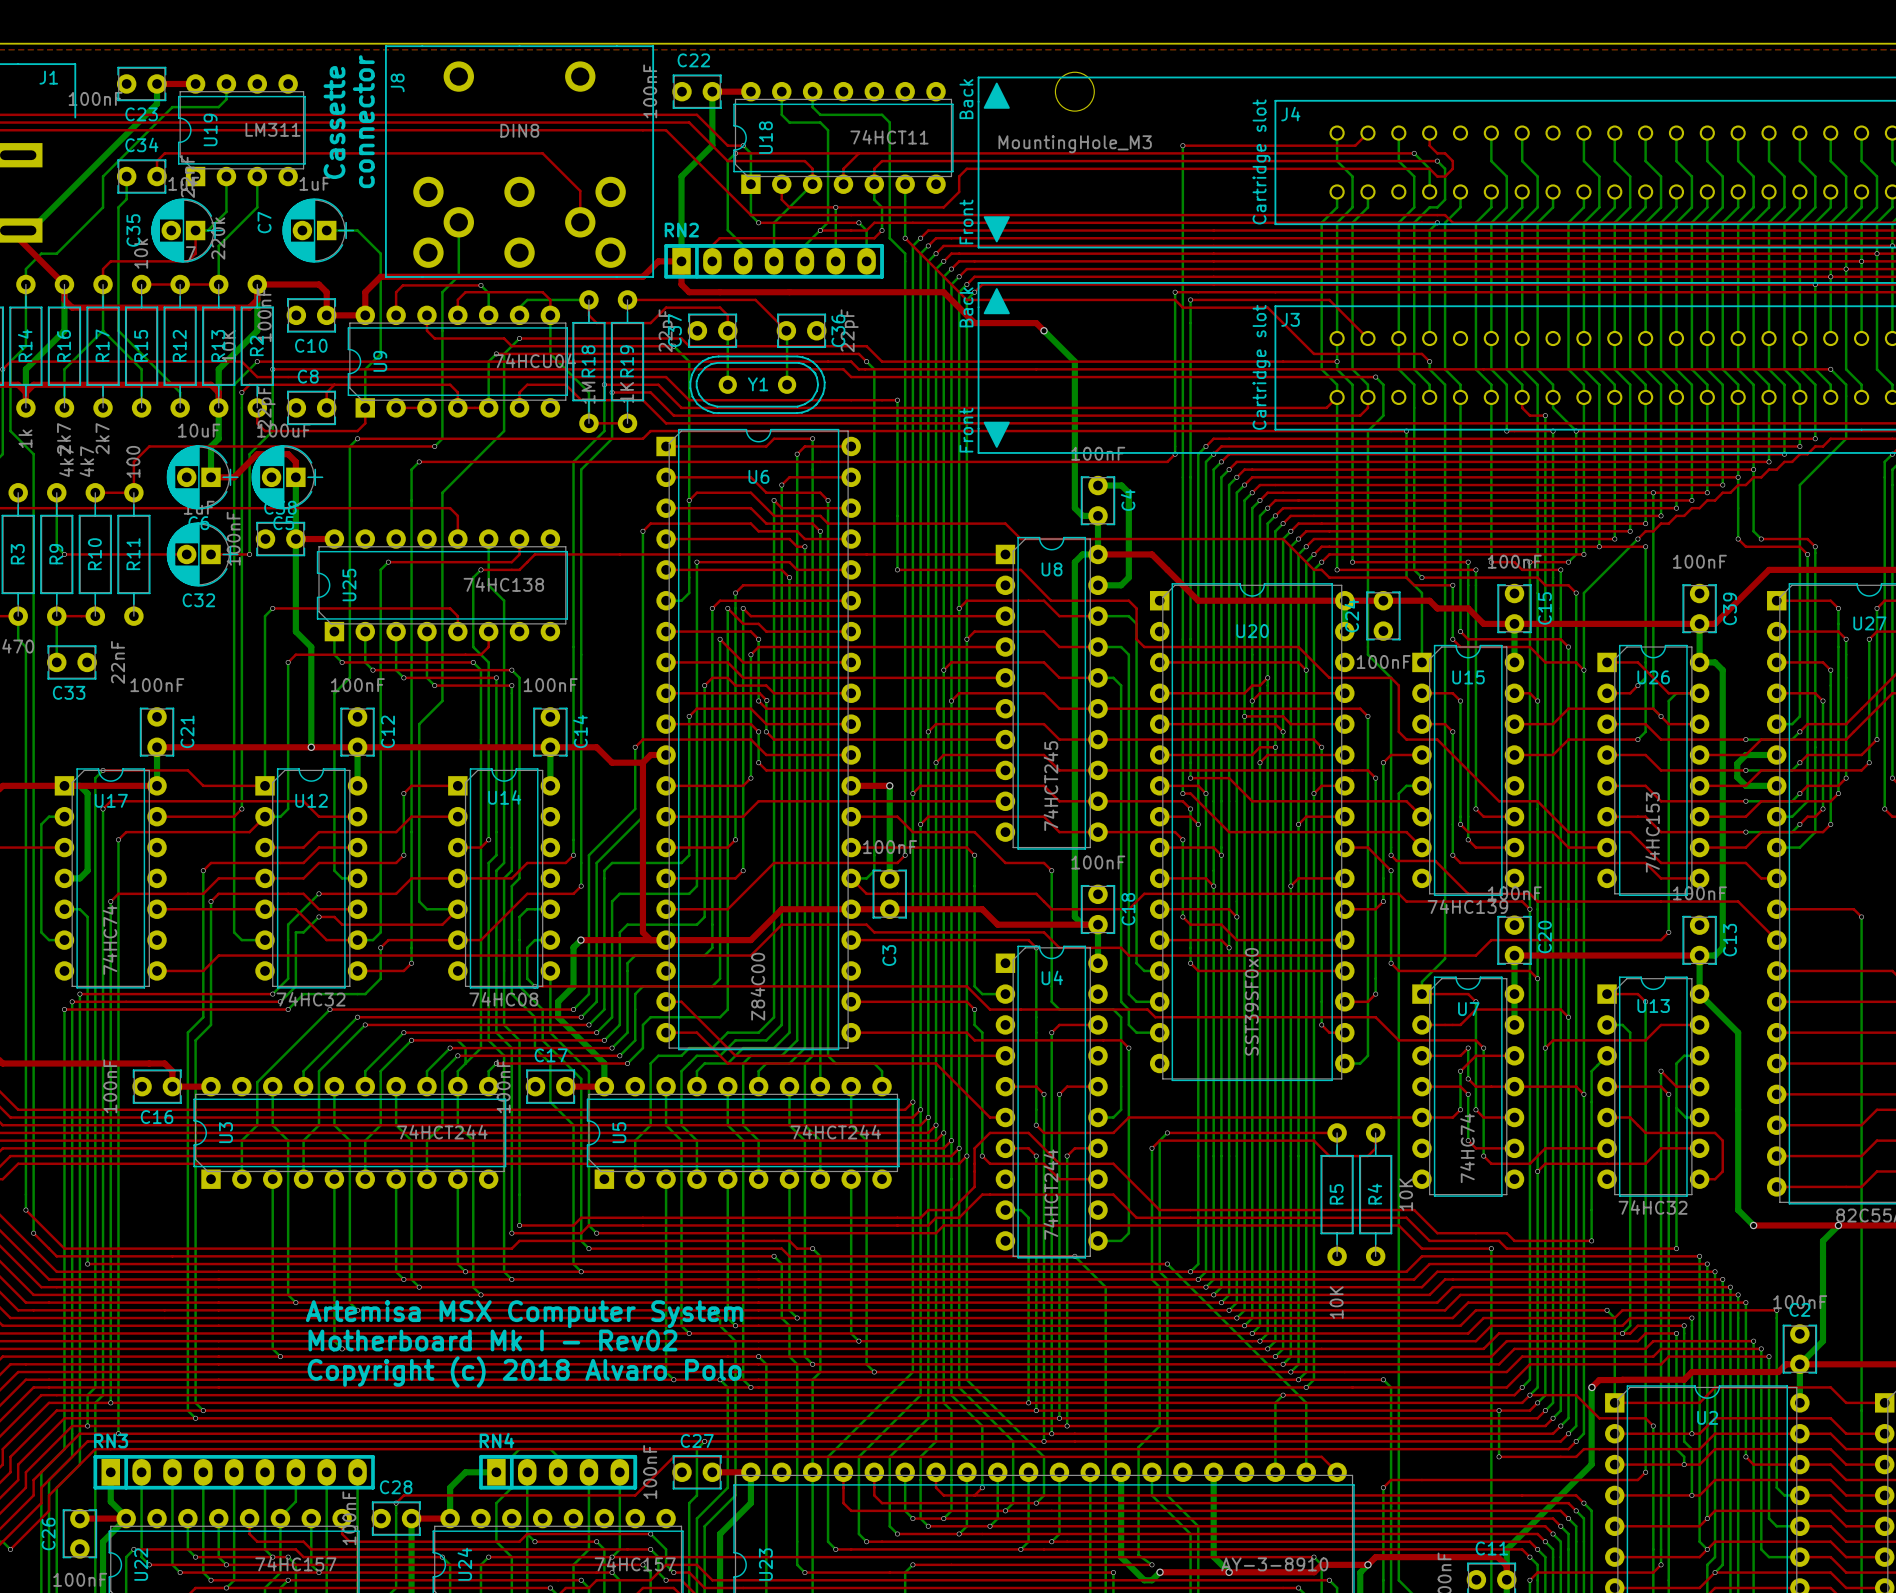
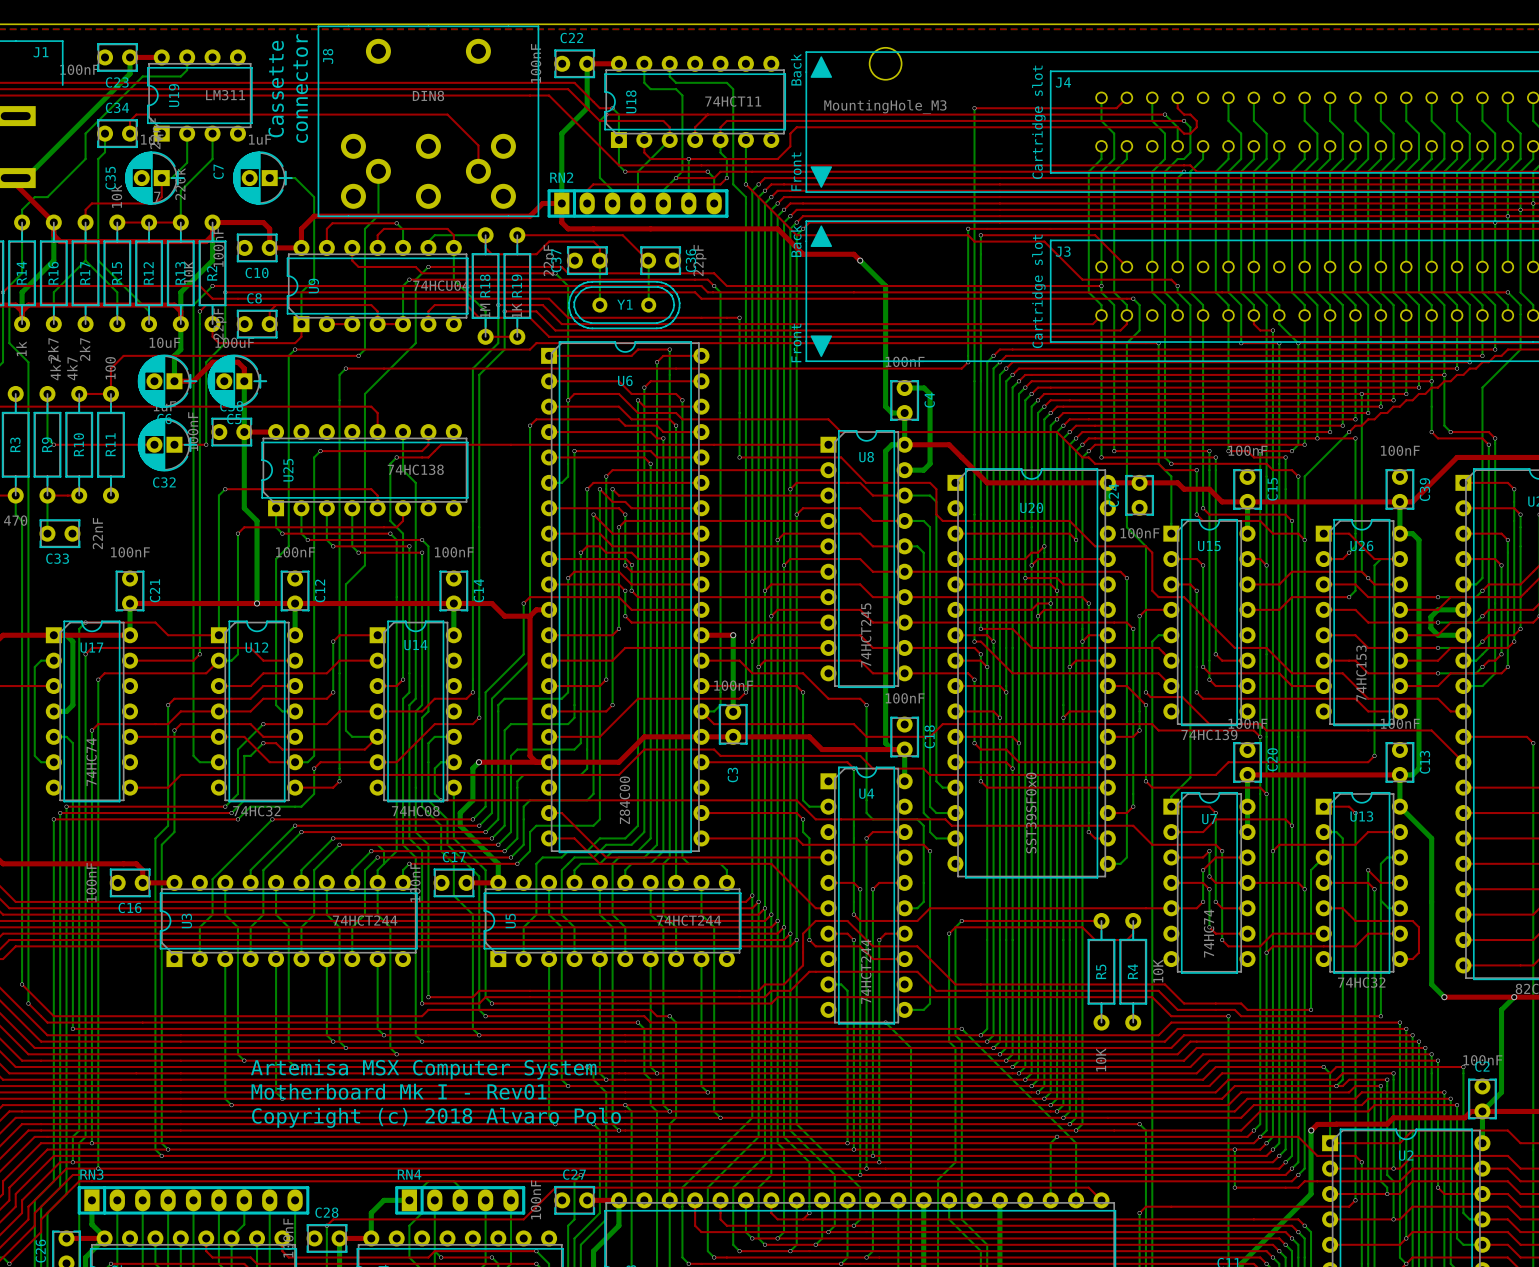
text: Motherboard Mk I - Rev02 (492, 1340) -> Motherboard Mk I - Rev01 (399, 1091)

